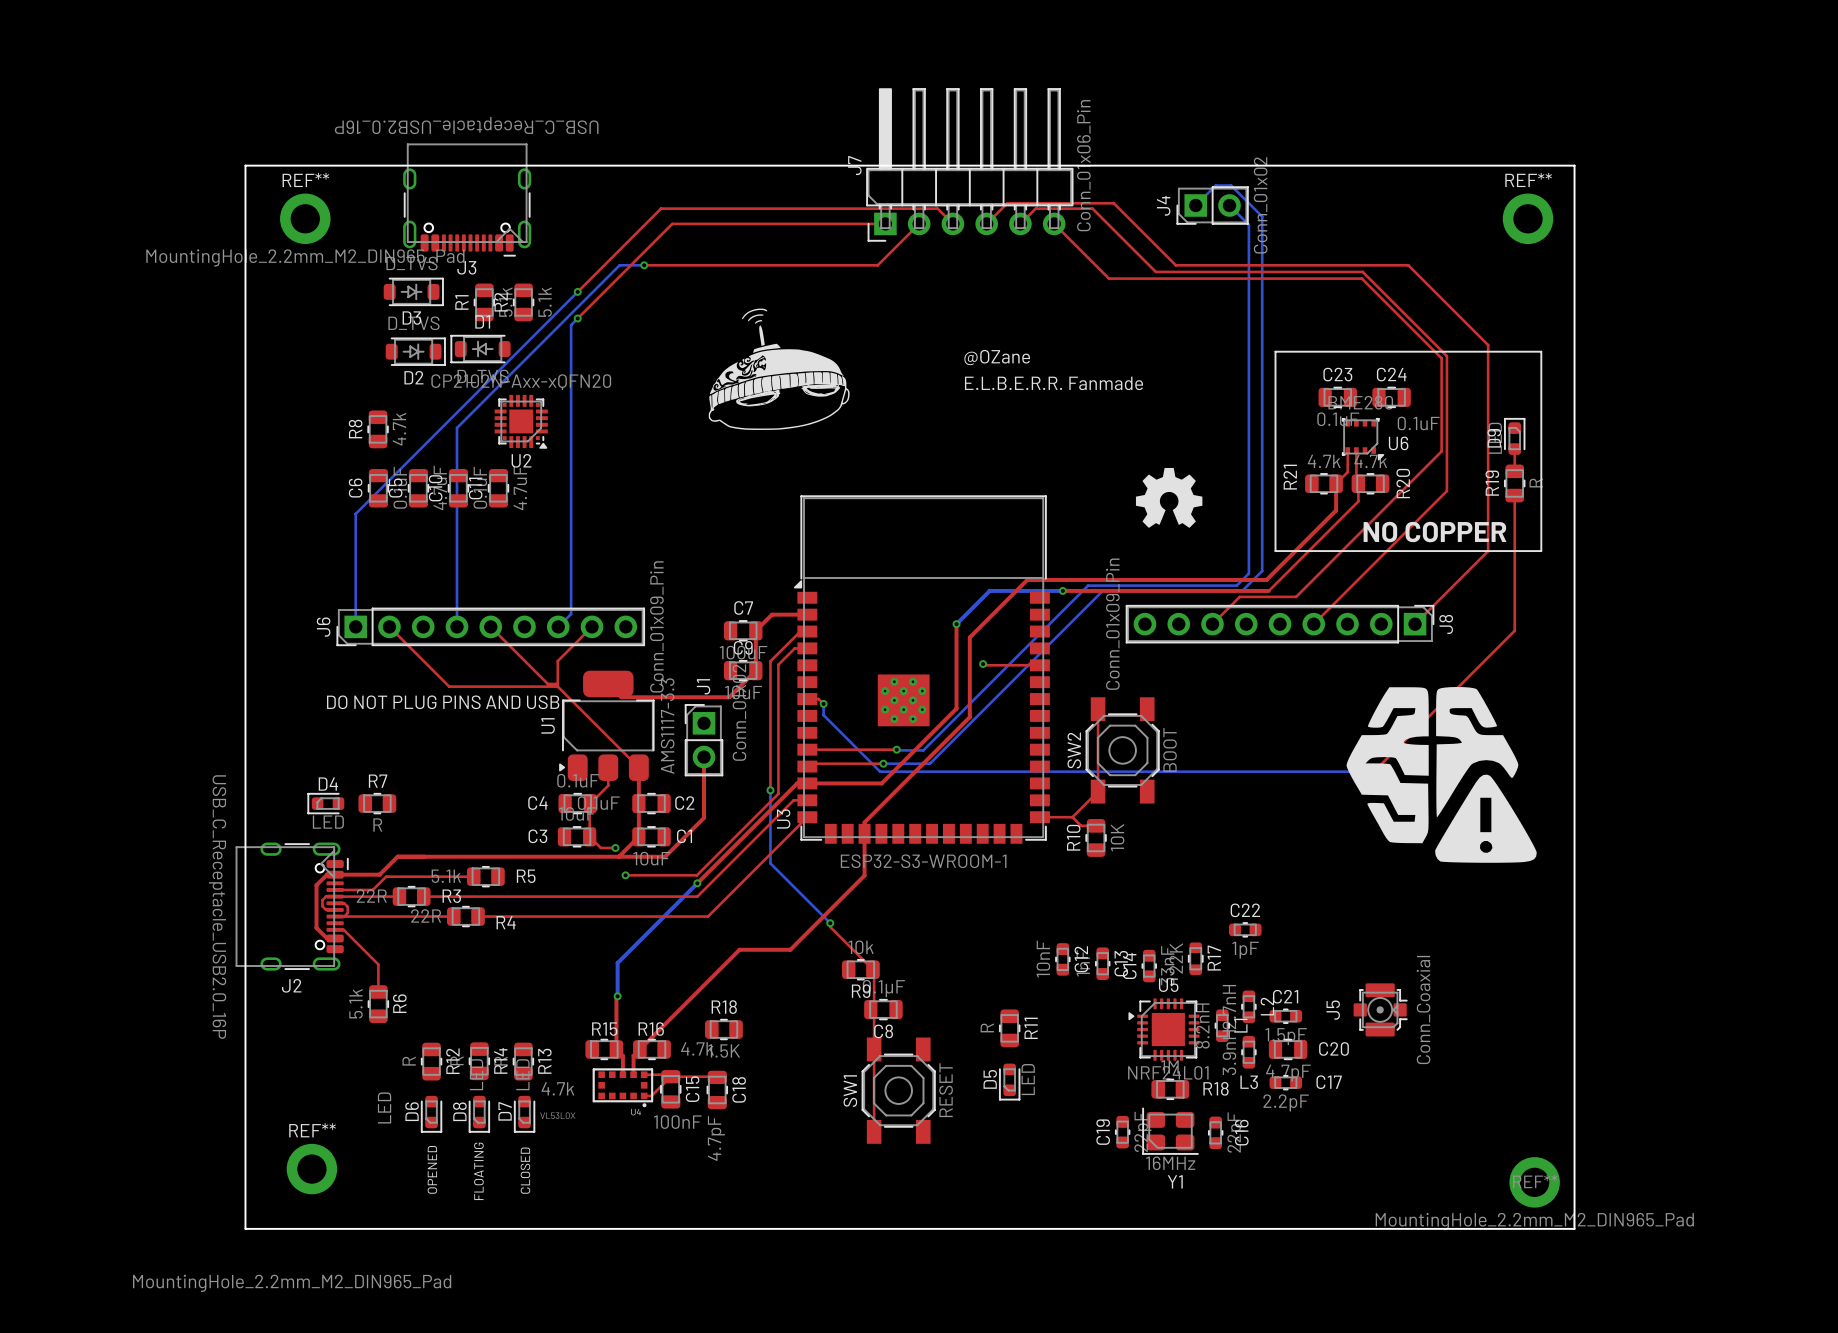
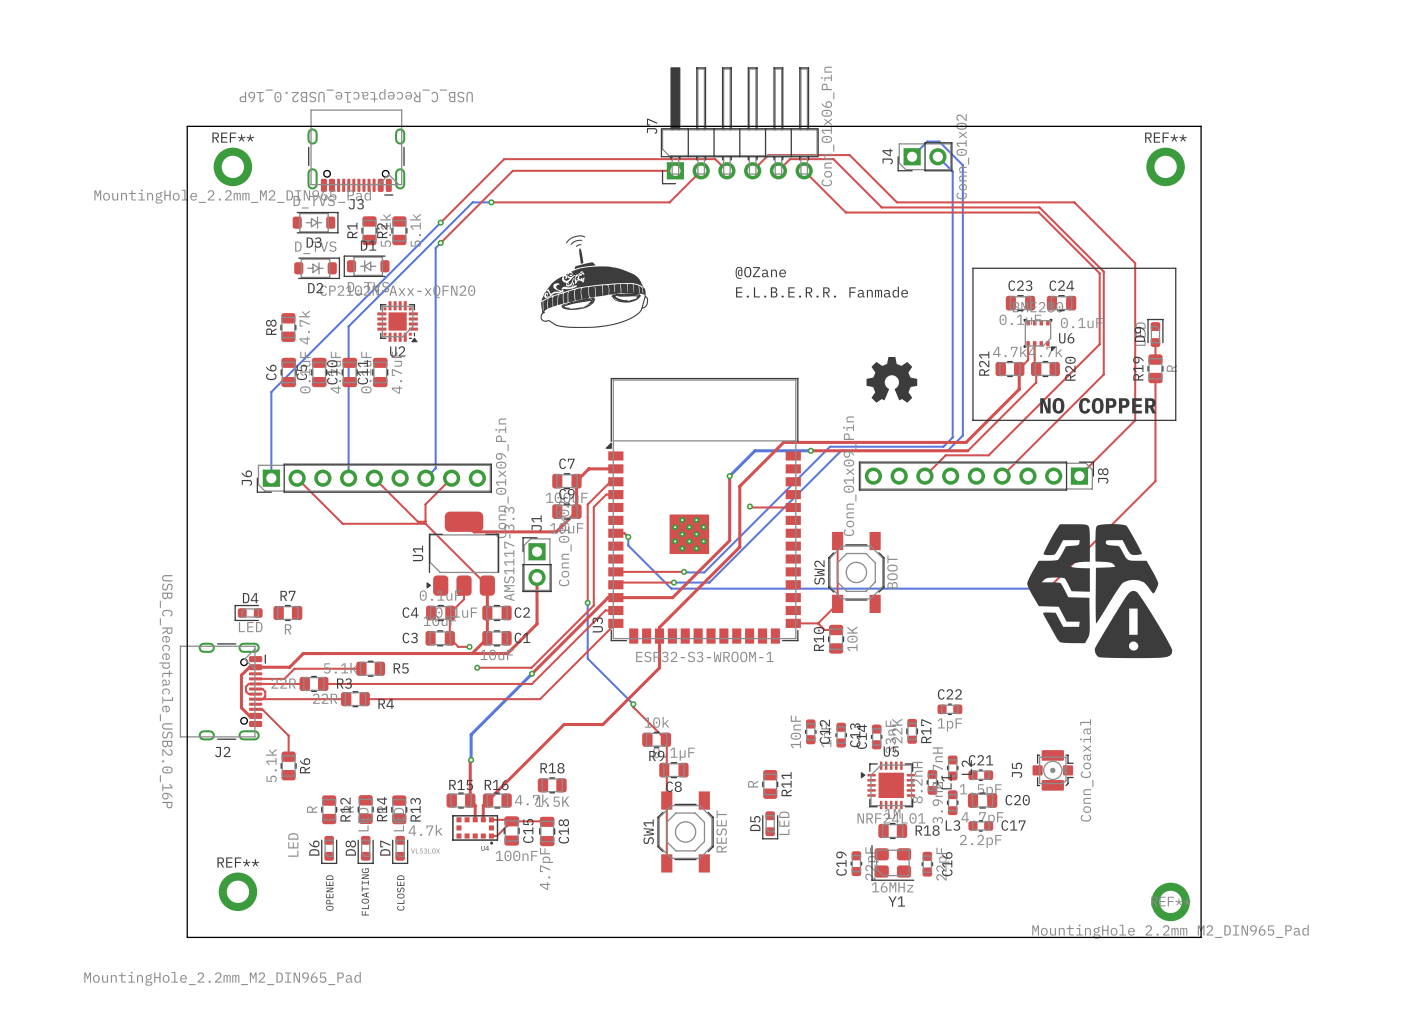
text: DO NOT PLUG PINS AND USB (443, 702) -> none

